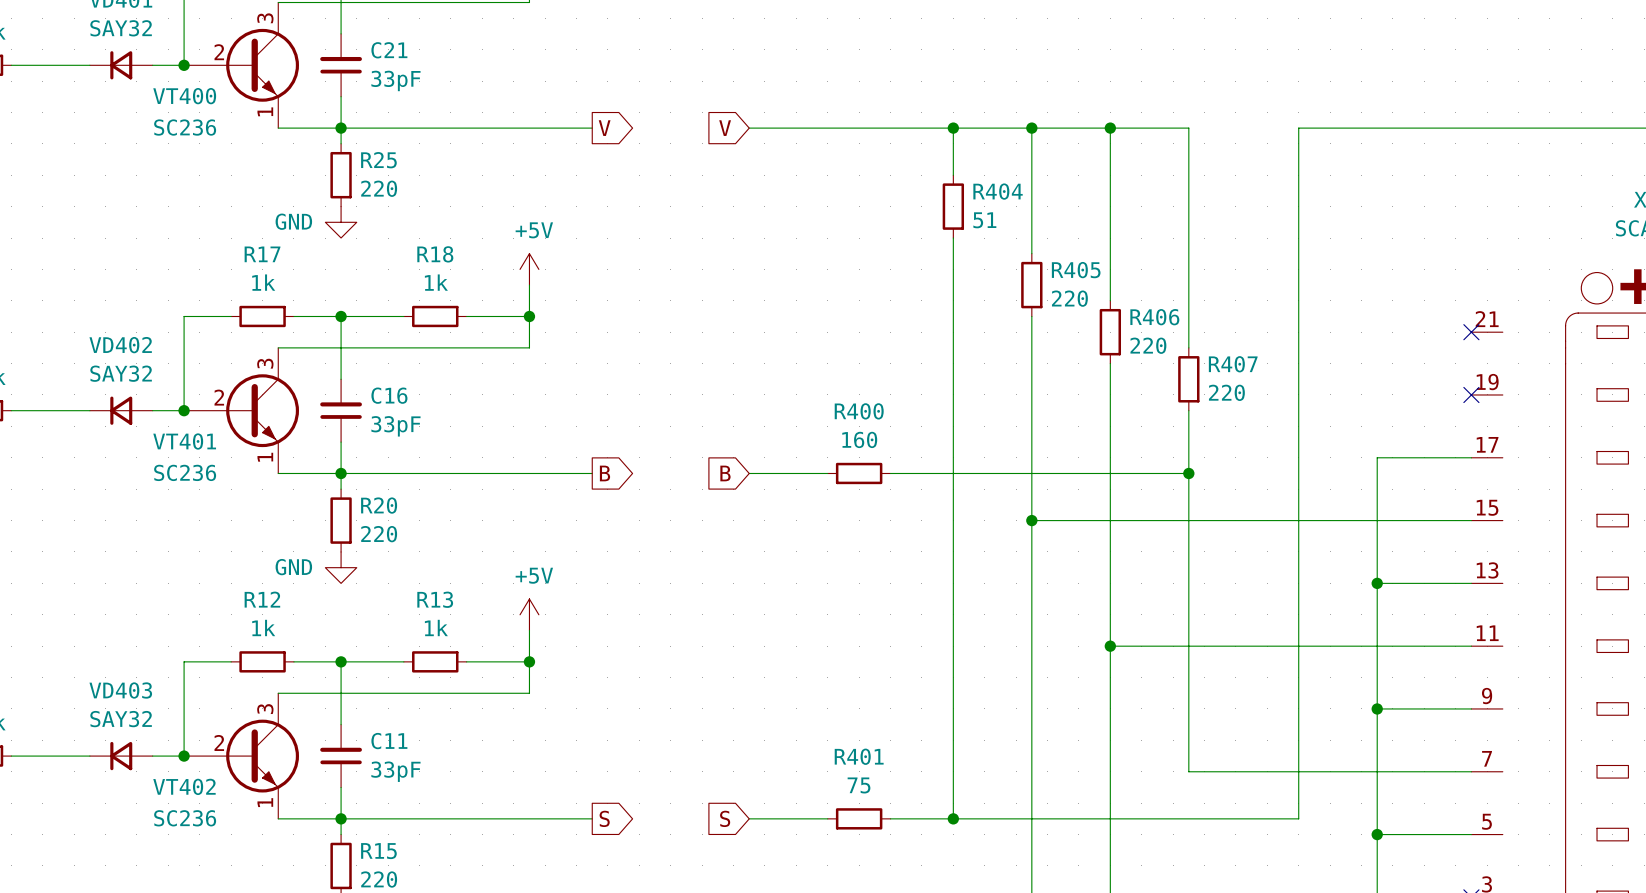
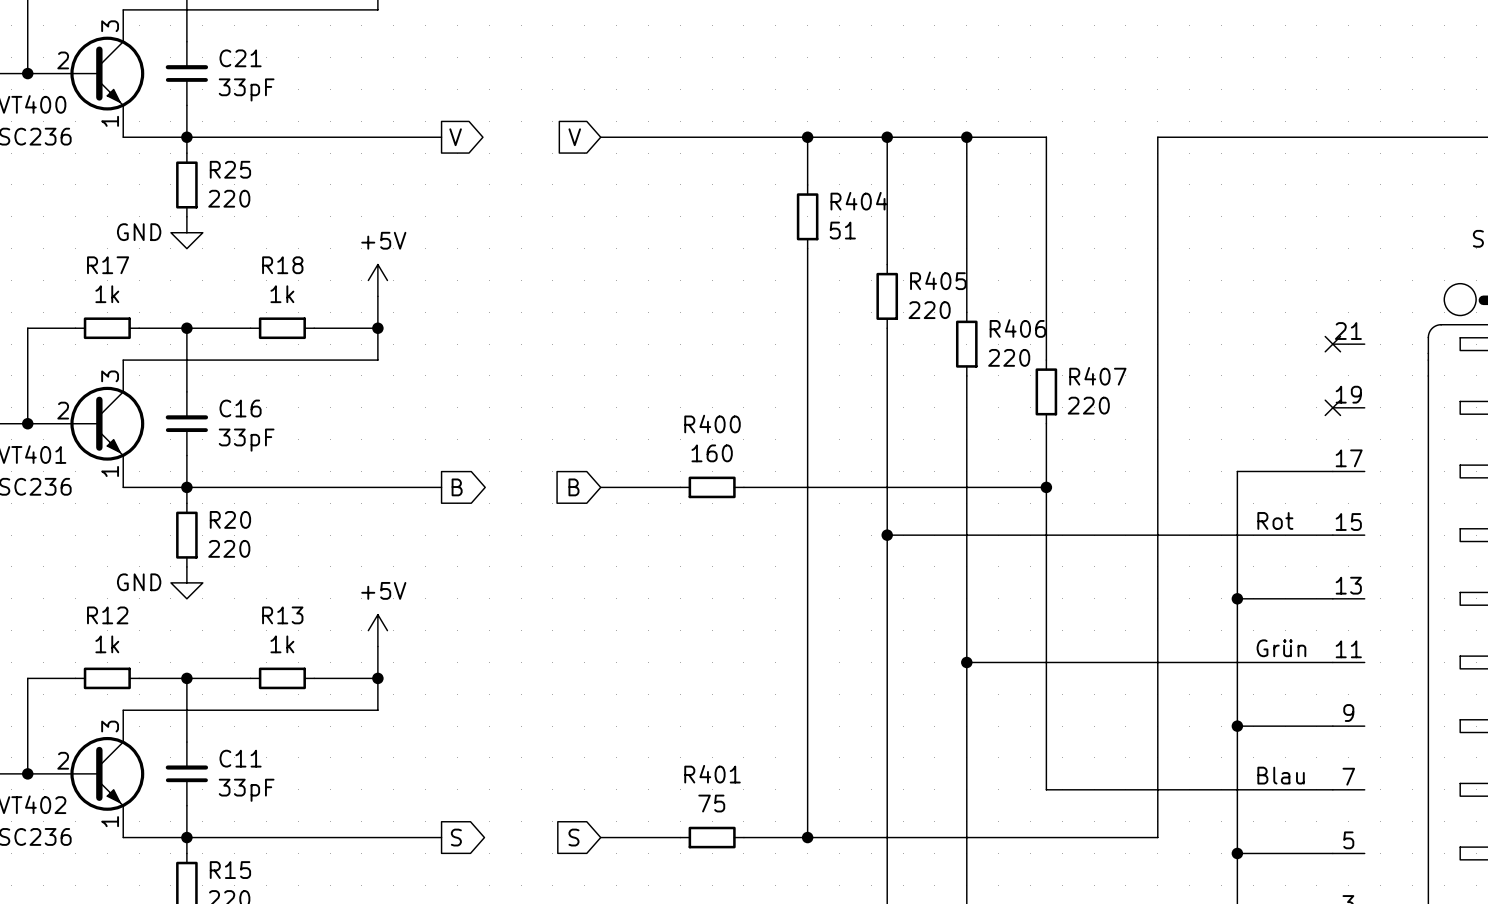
label: none -> Rot (1275, 520)
label: none -> Grün (1281, 648)
label: none -> Blau (1281, 775)

